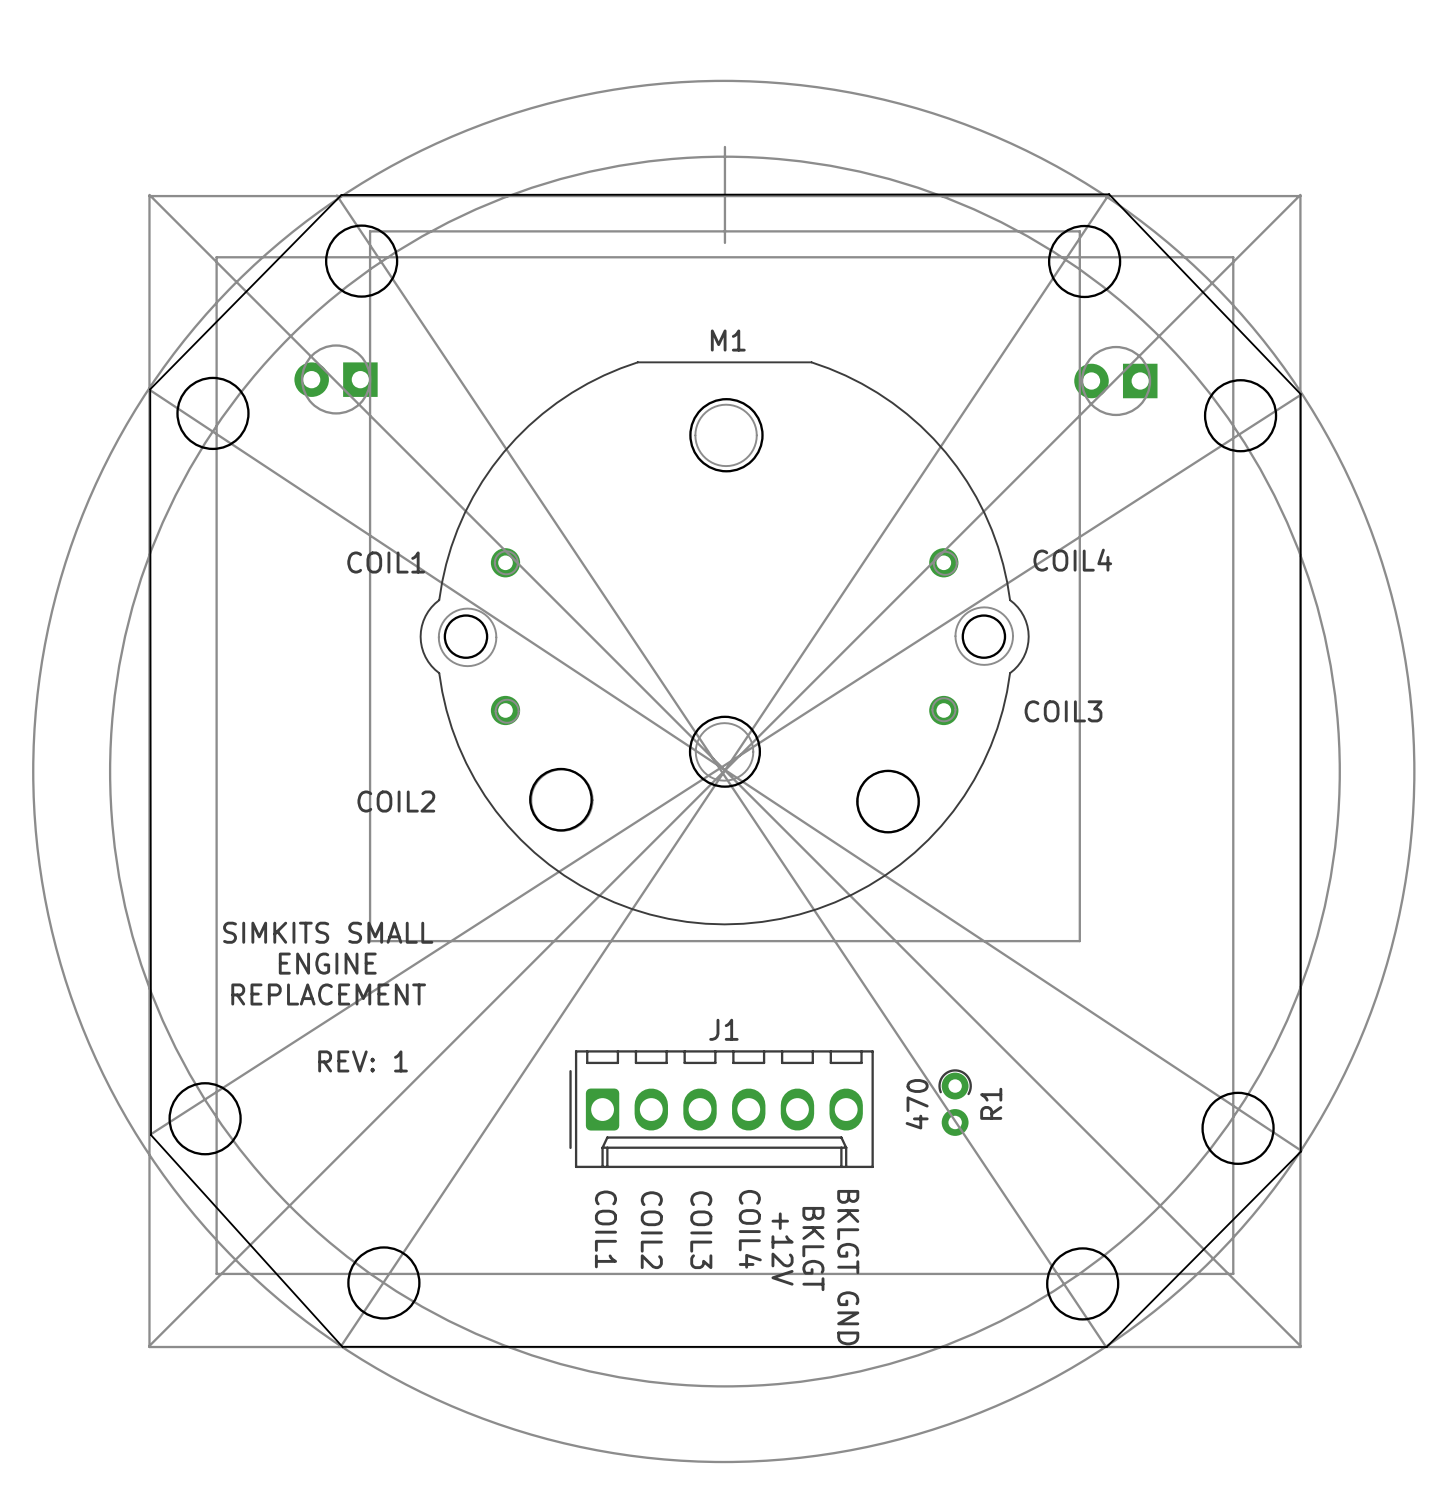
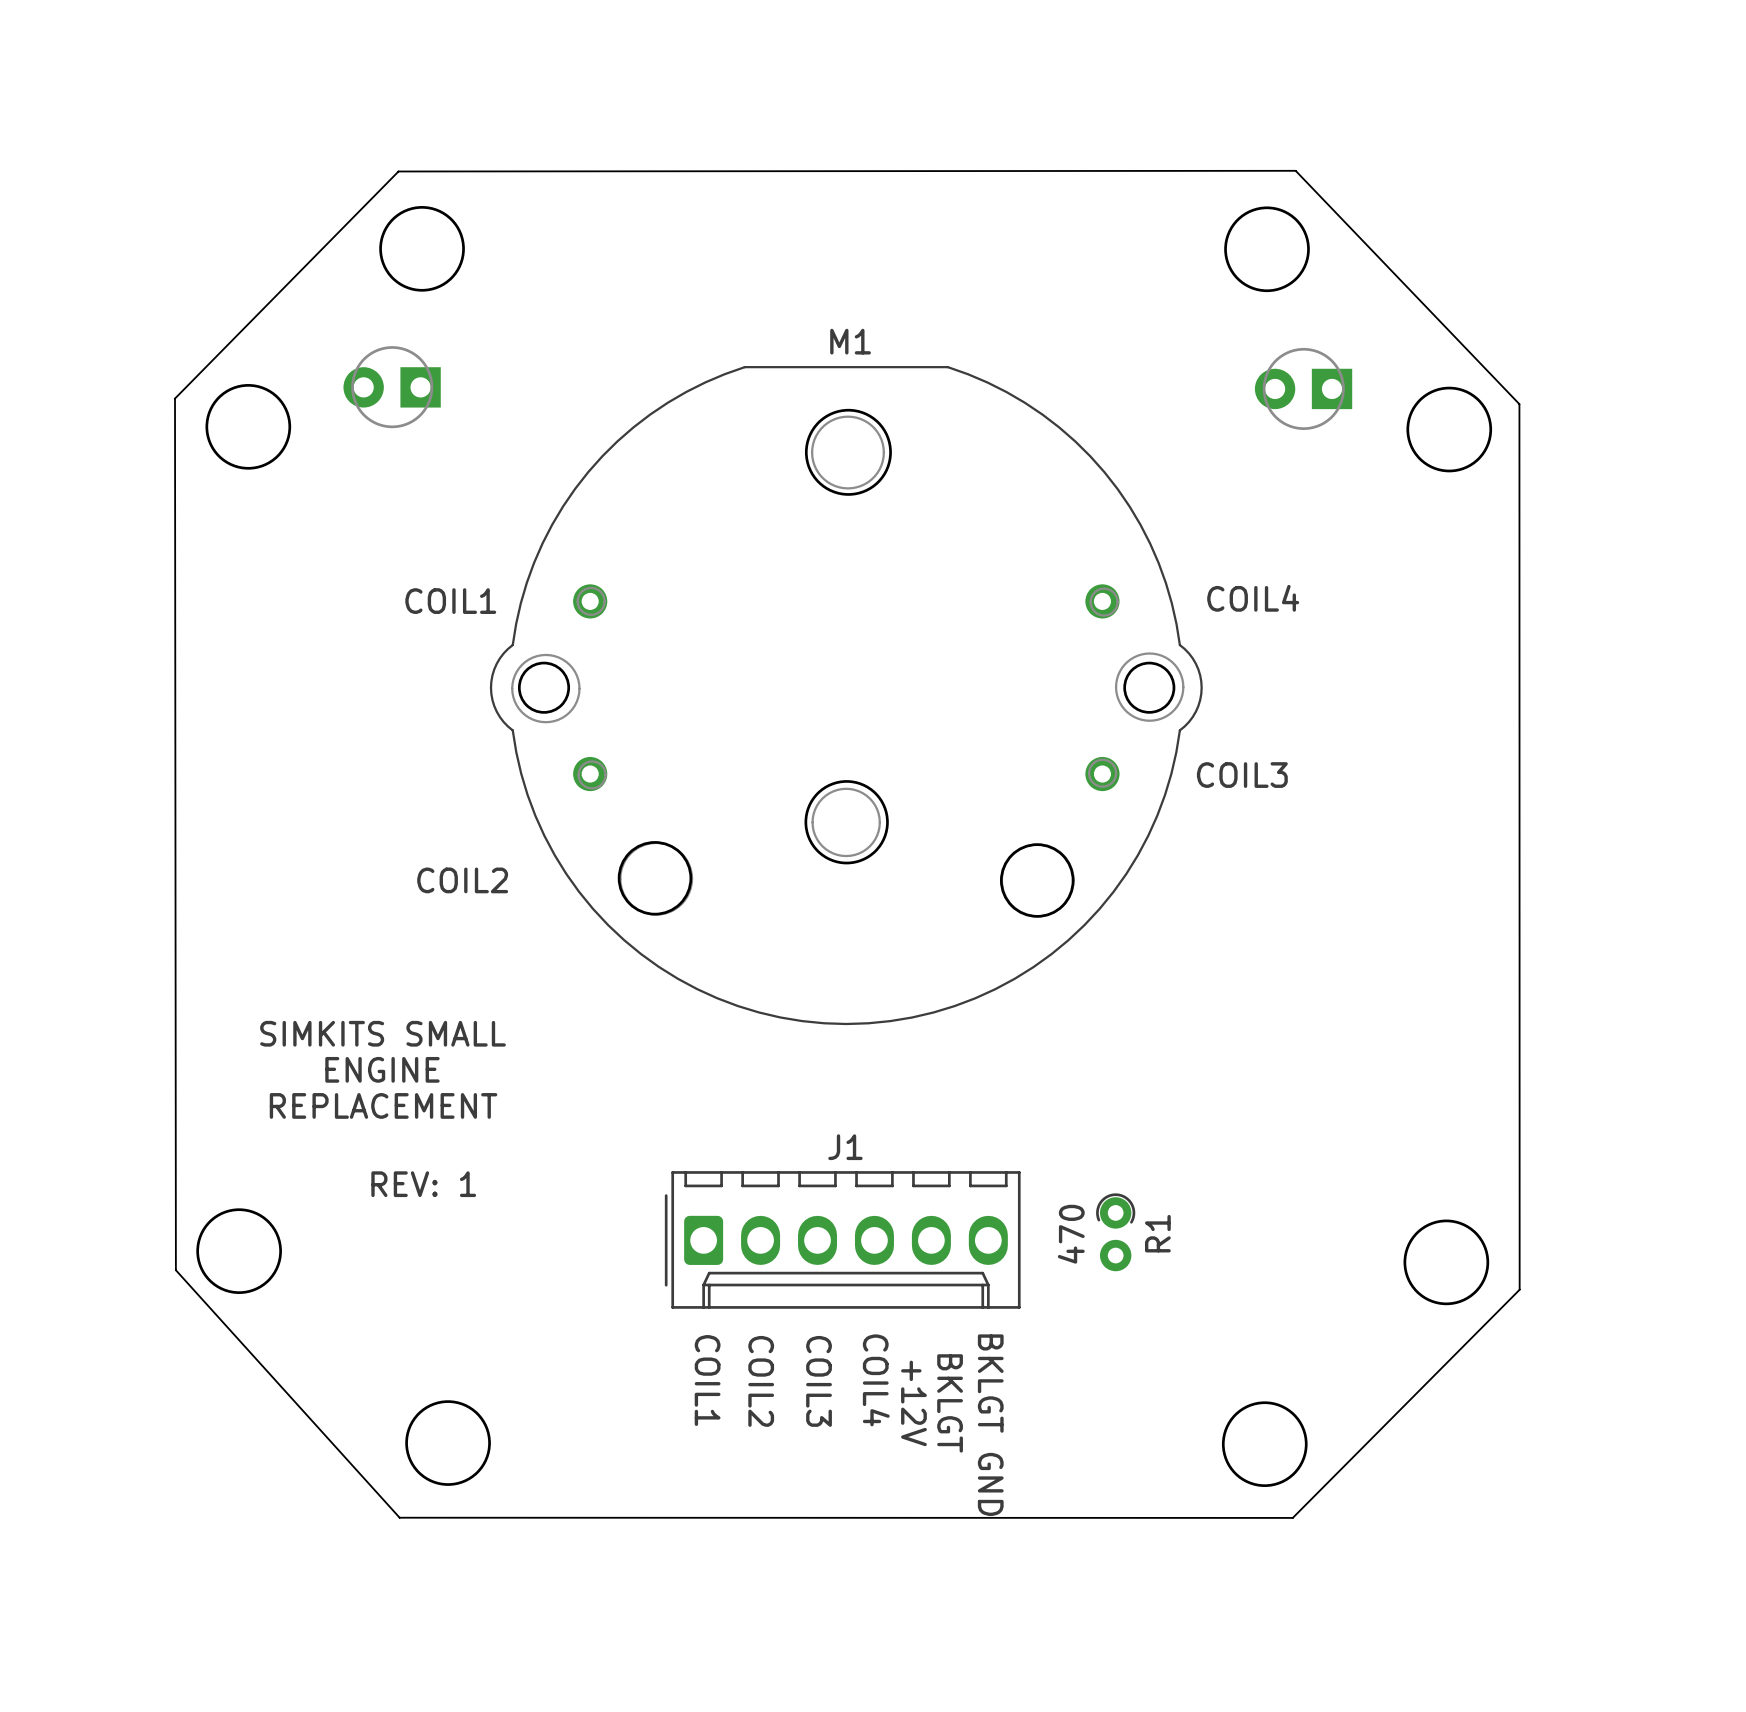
drawing: [32, 79, 1416, 1464] -> none
line: (724, 146) (724, 242) -> none
line: (149, 194) (1300, 1345) -> none
line: (1109, 194) (342, 1344) -> none
line: (1300, 194) (149, 1345) -> none
line: (336, 195) (1106, 1347) -> none
line: (149, 196) (1300, 196) (1300, 1347) (149, 1347) (149, 196) -> none
line: (370, 231) (1079, 231) (1079, 941) (370, 941) (370, 231) -> none
line: (216, 257) (1233, 257) (1233, 1273) (216, 1273) (216, 257) -> none
line: (150, 390) (1301, 1150) -> none
line: (1300, 395) (150, 1134) -> none

